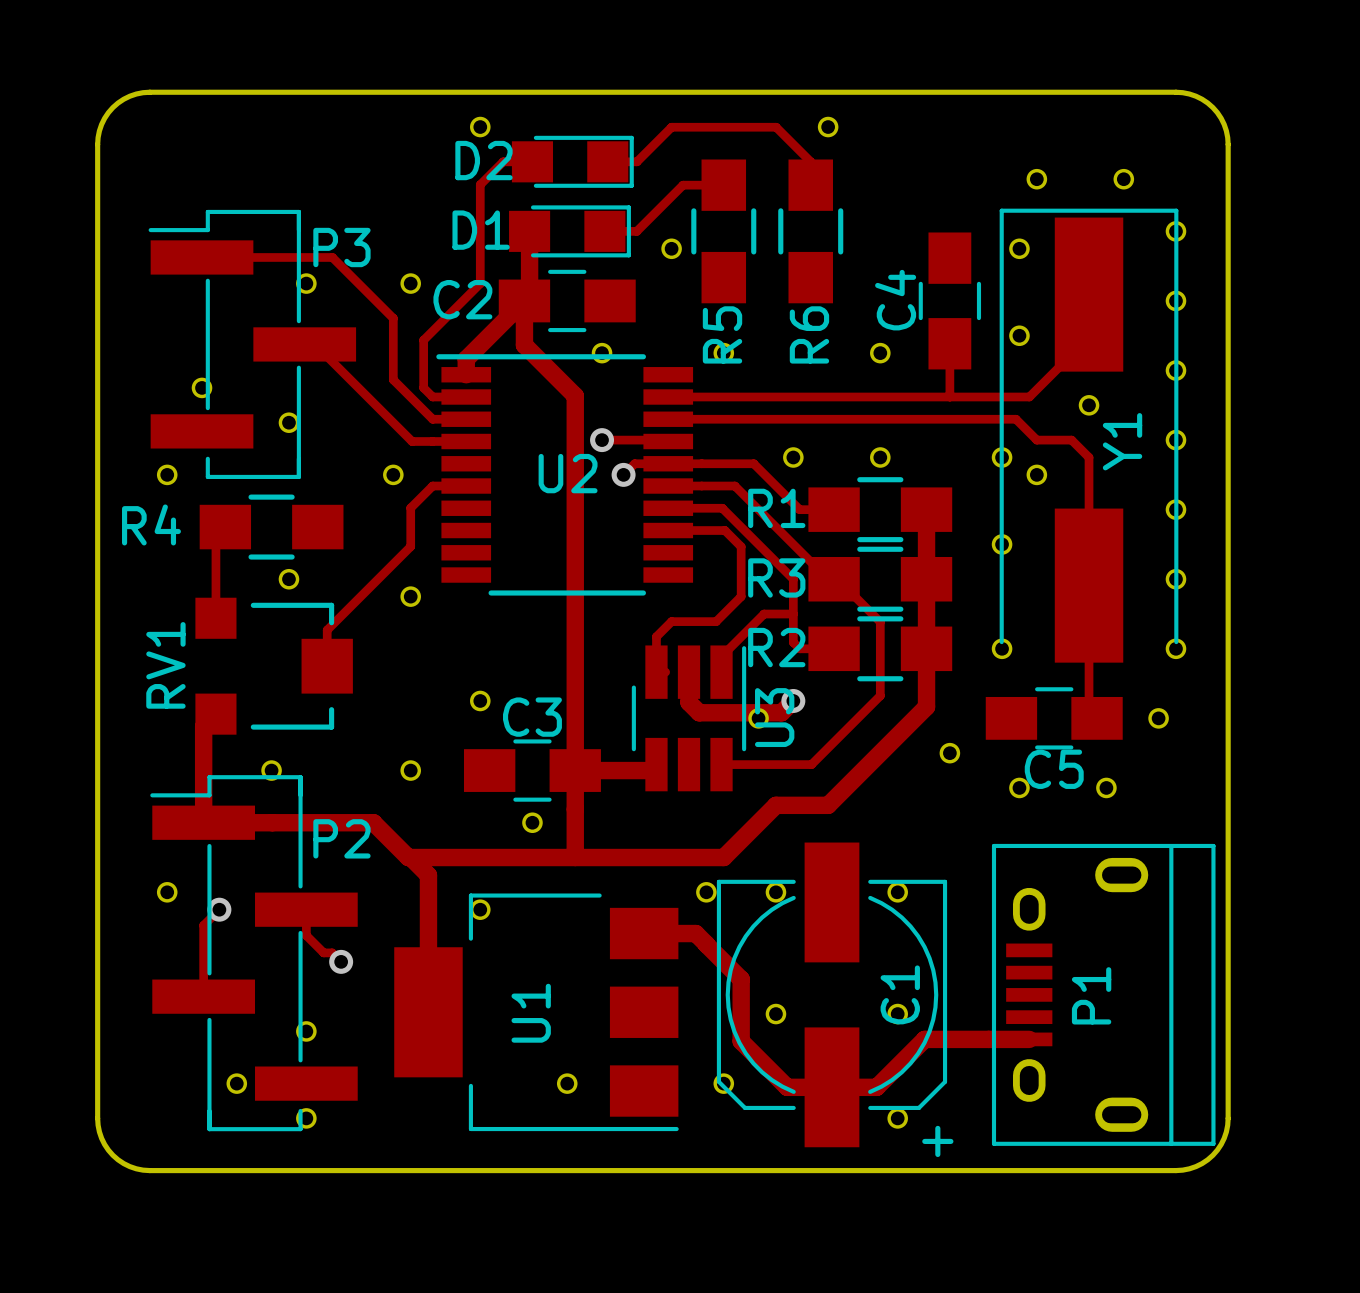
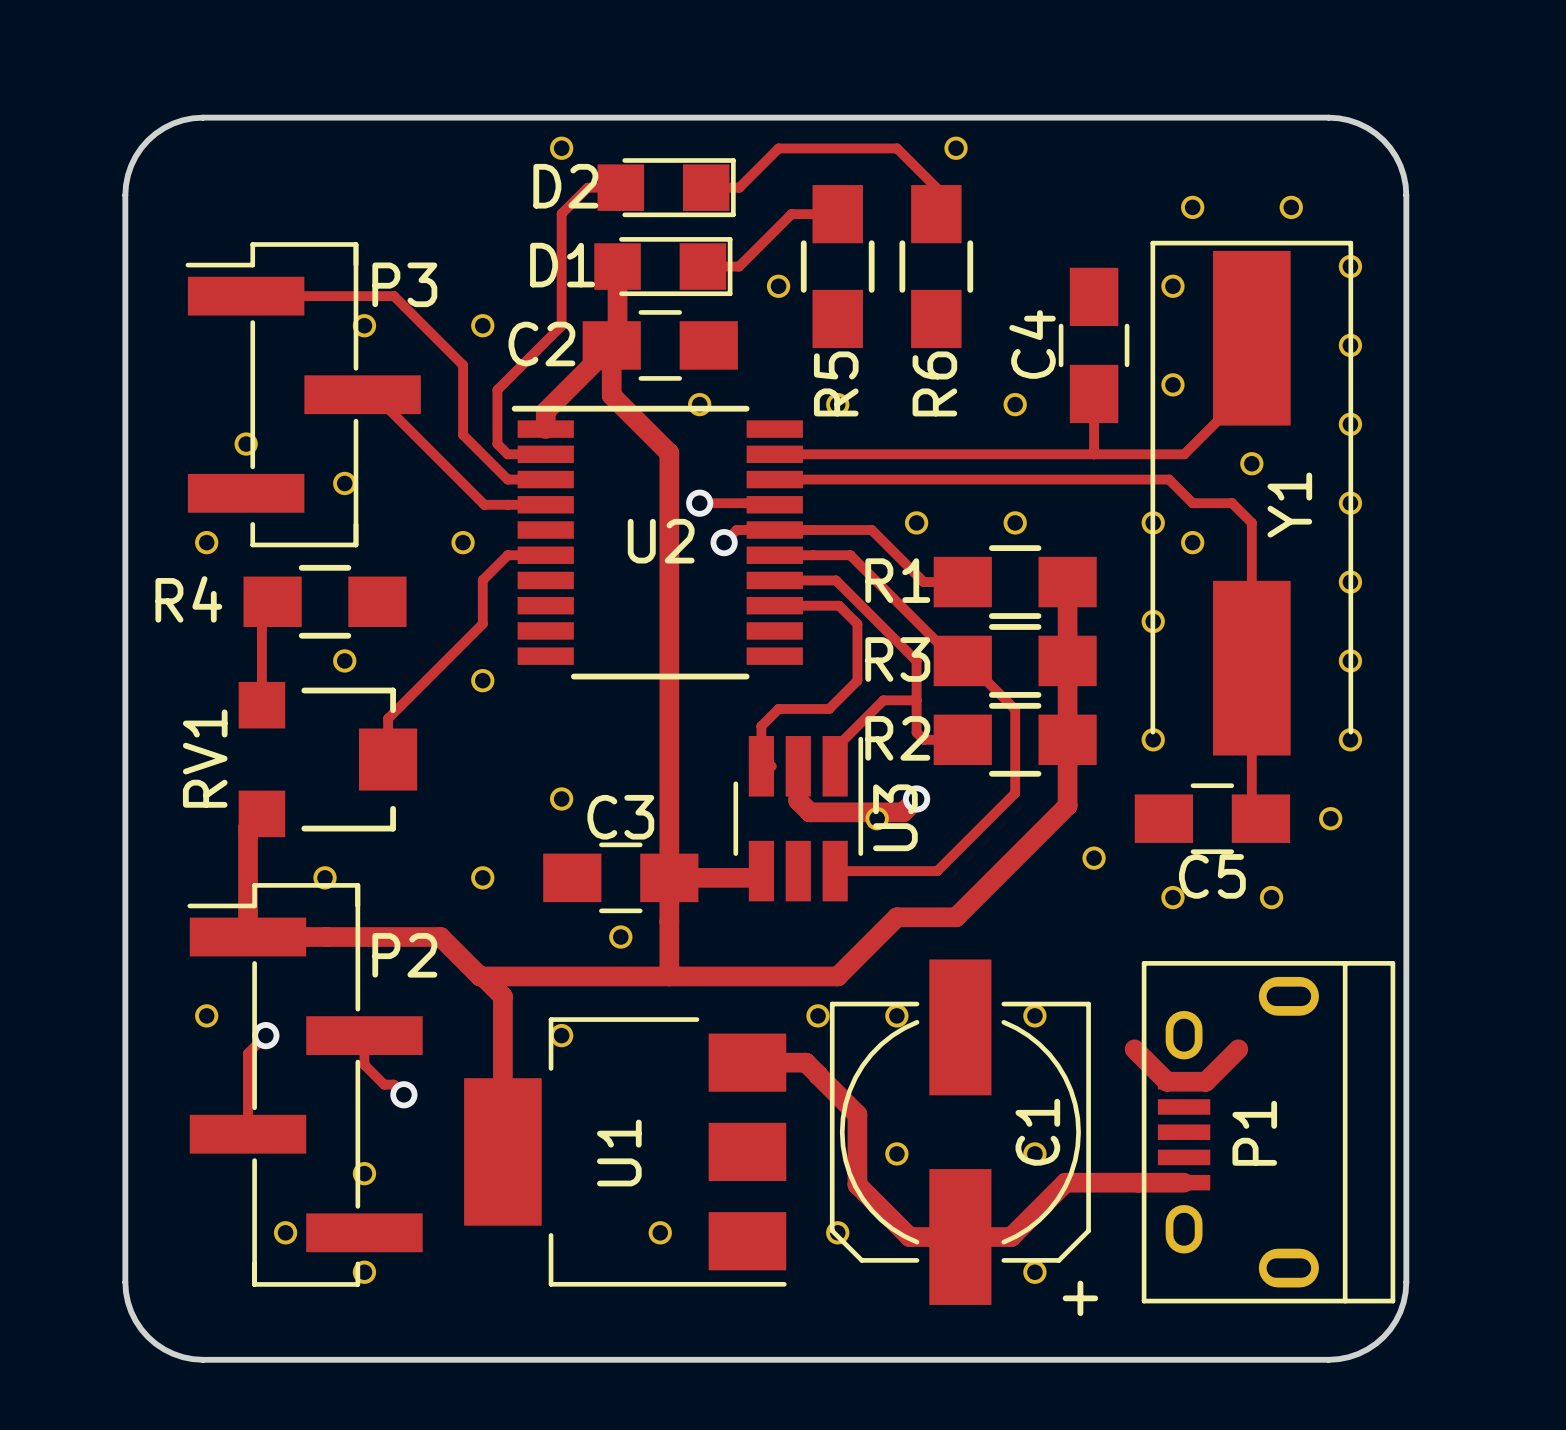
board edge: (149, 92) (1175, 92) (1195, 96) (1212, 107) (1224, 124) (1228, 144) (1228, 1118) (1224, 1138) (1212, 1155) (1195, 1166) (1175, 1170) (149, 1170) (129, 1166) (112, 1155) (101, 1138) (97, 1118) (97, 144) (101, 124) (112, 107) (129, 96) (149, 92) -> (202, 117) (173, 123) (148, 140) (131, 165) (125, 195) (125, 1282) (131, 1311) (148, 1337) (173, 1353) (202, 1359) (1328, 1359) (1358, 1353) (1383, 1337) (1400, 1311) (1406, 1282) (1406, 195) (1400, 165) (1383, 140) (1358, 123) (1328, 117) (202, 117)
track: none -> (1134, 1049) (1167, 1081) (1205, 1081) (1238, 1049)

